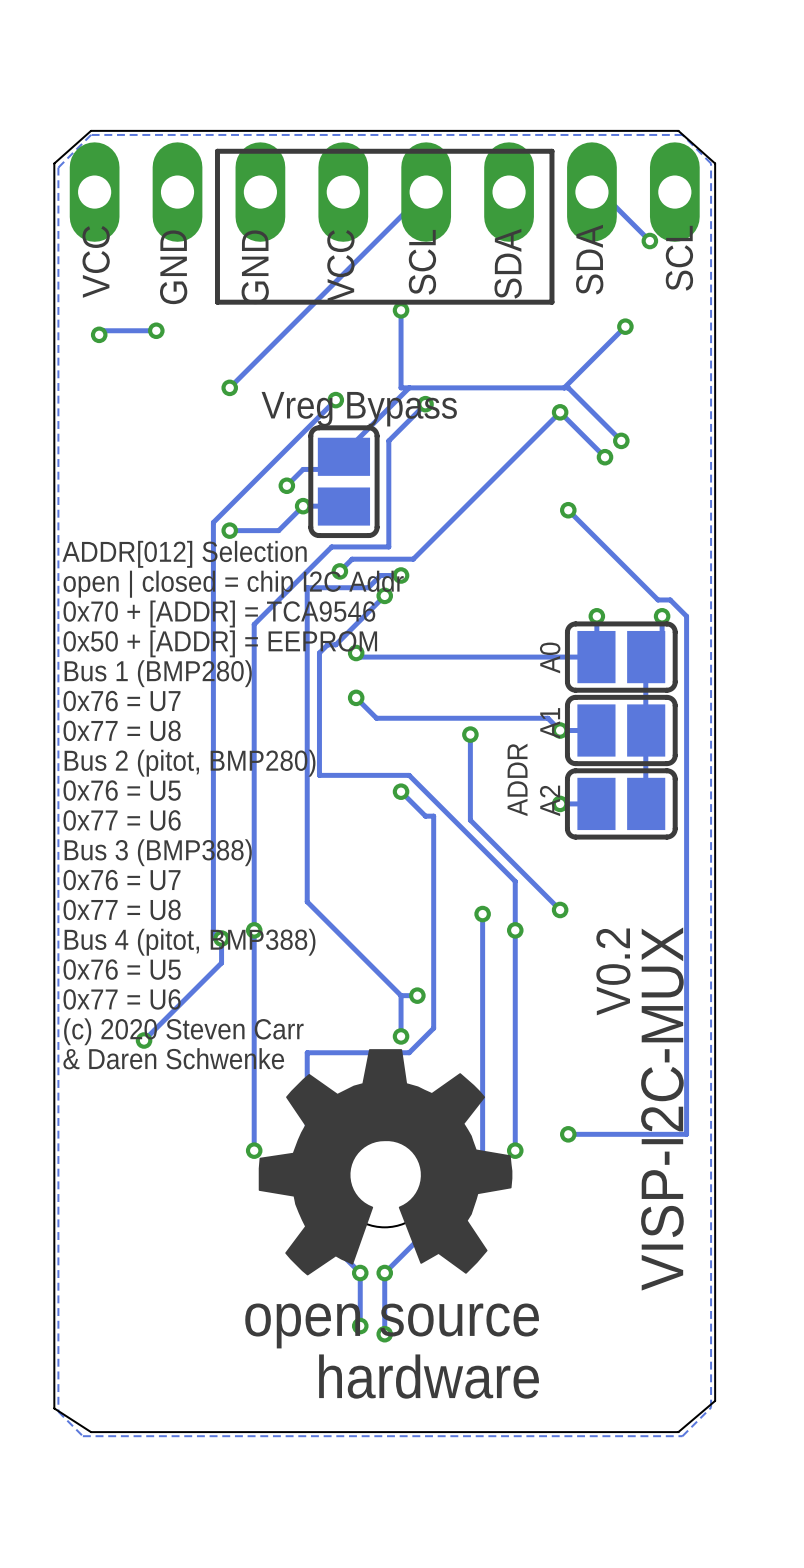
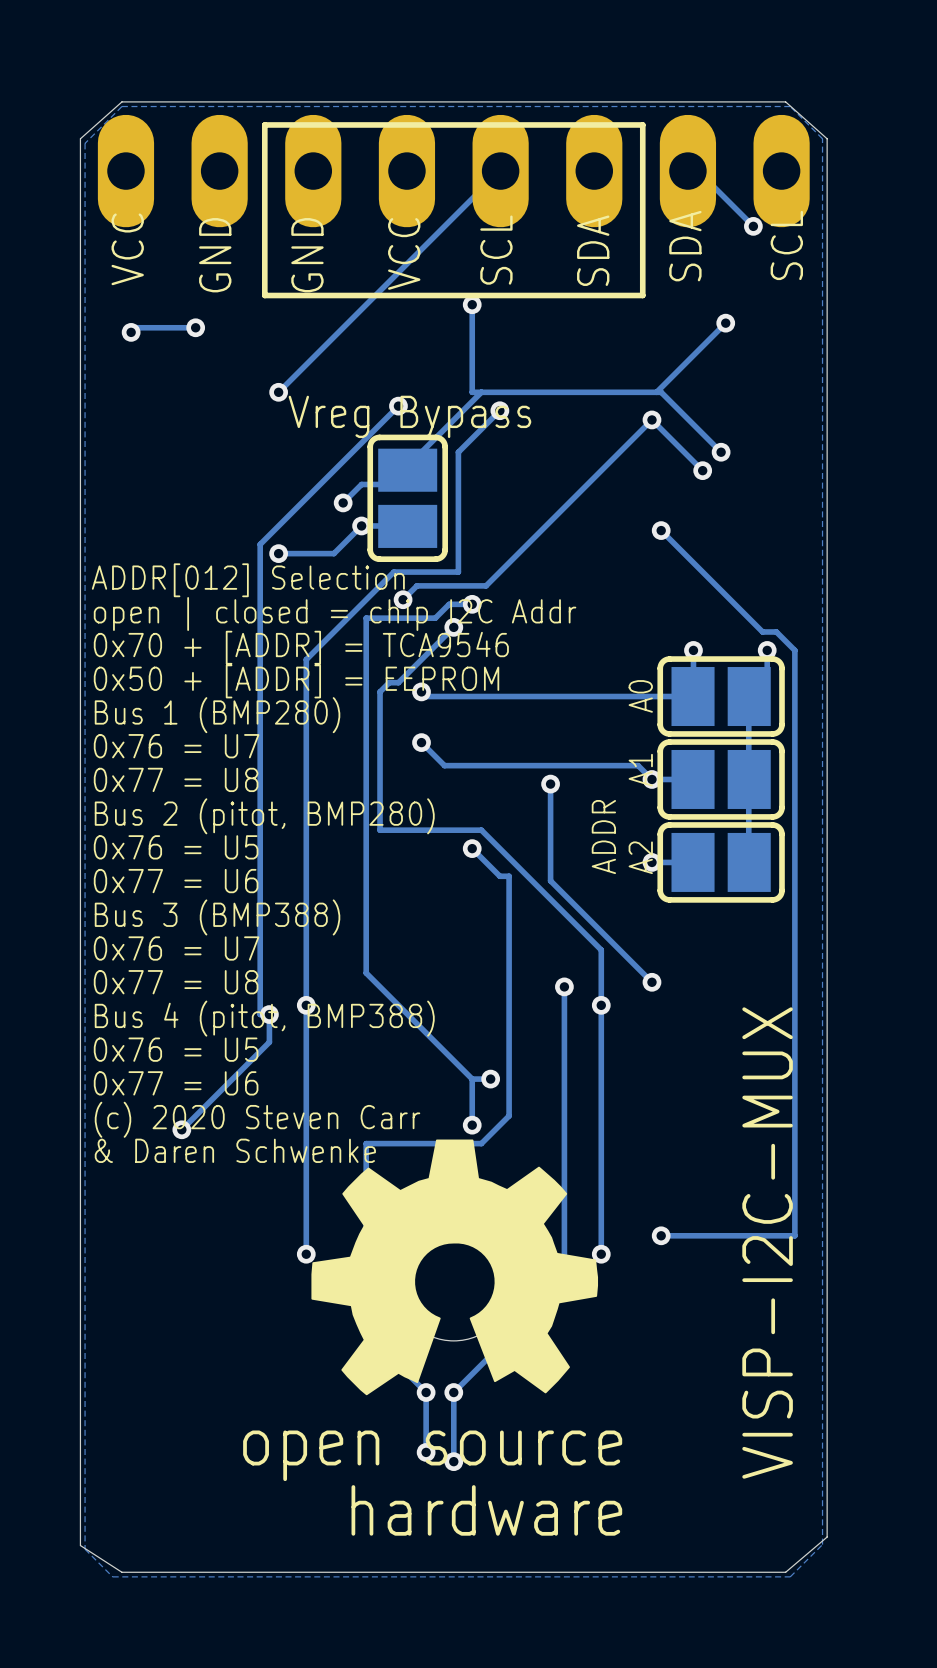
text: V0.2 (613, 971) -> none

